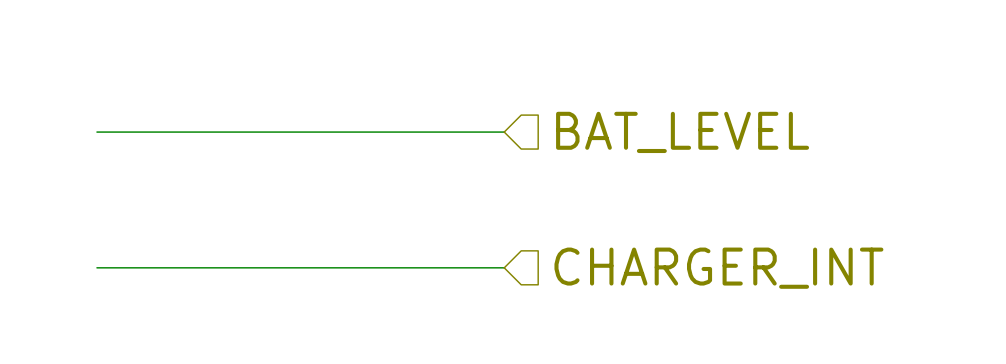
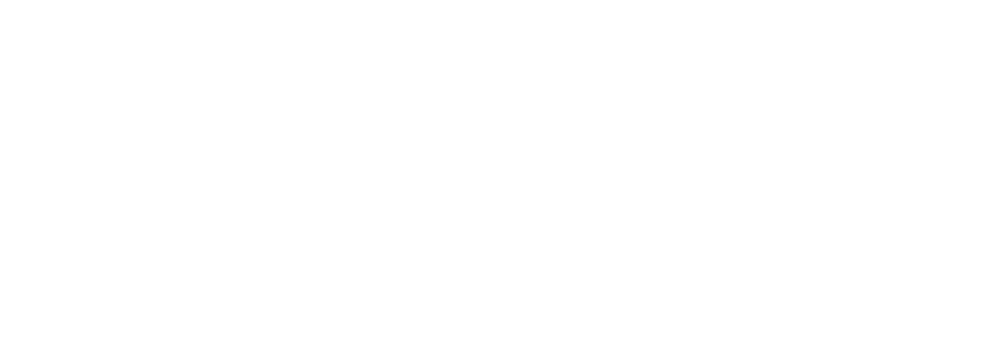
wire: (96, 132) (504, 132) -> none
hierarchical label: BAT_LEVEL (682, 132) -> none
wire: (96, 267) (504, 267) -> none
hierarchical label: CHARGER_INT (718, 268) -> none

